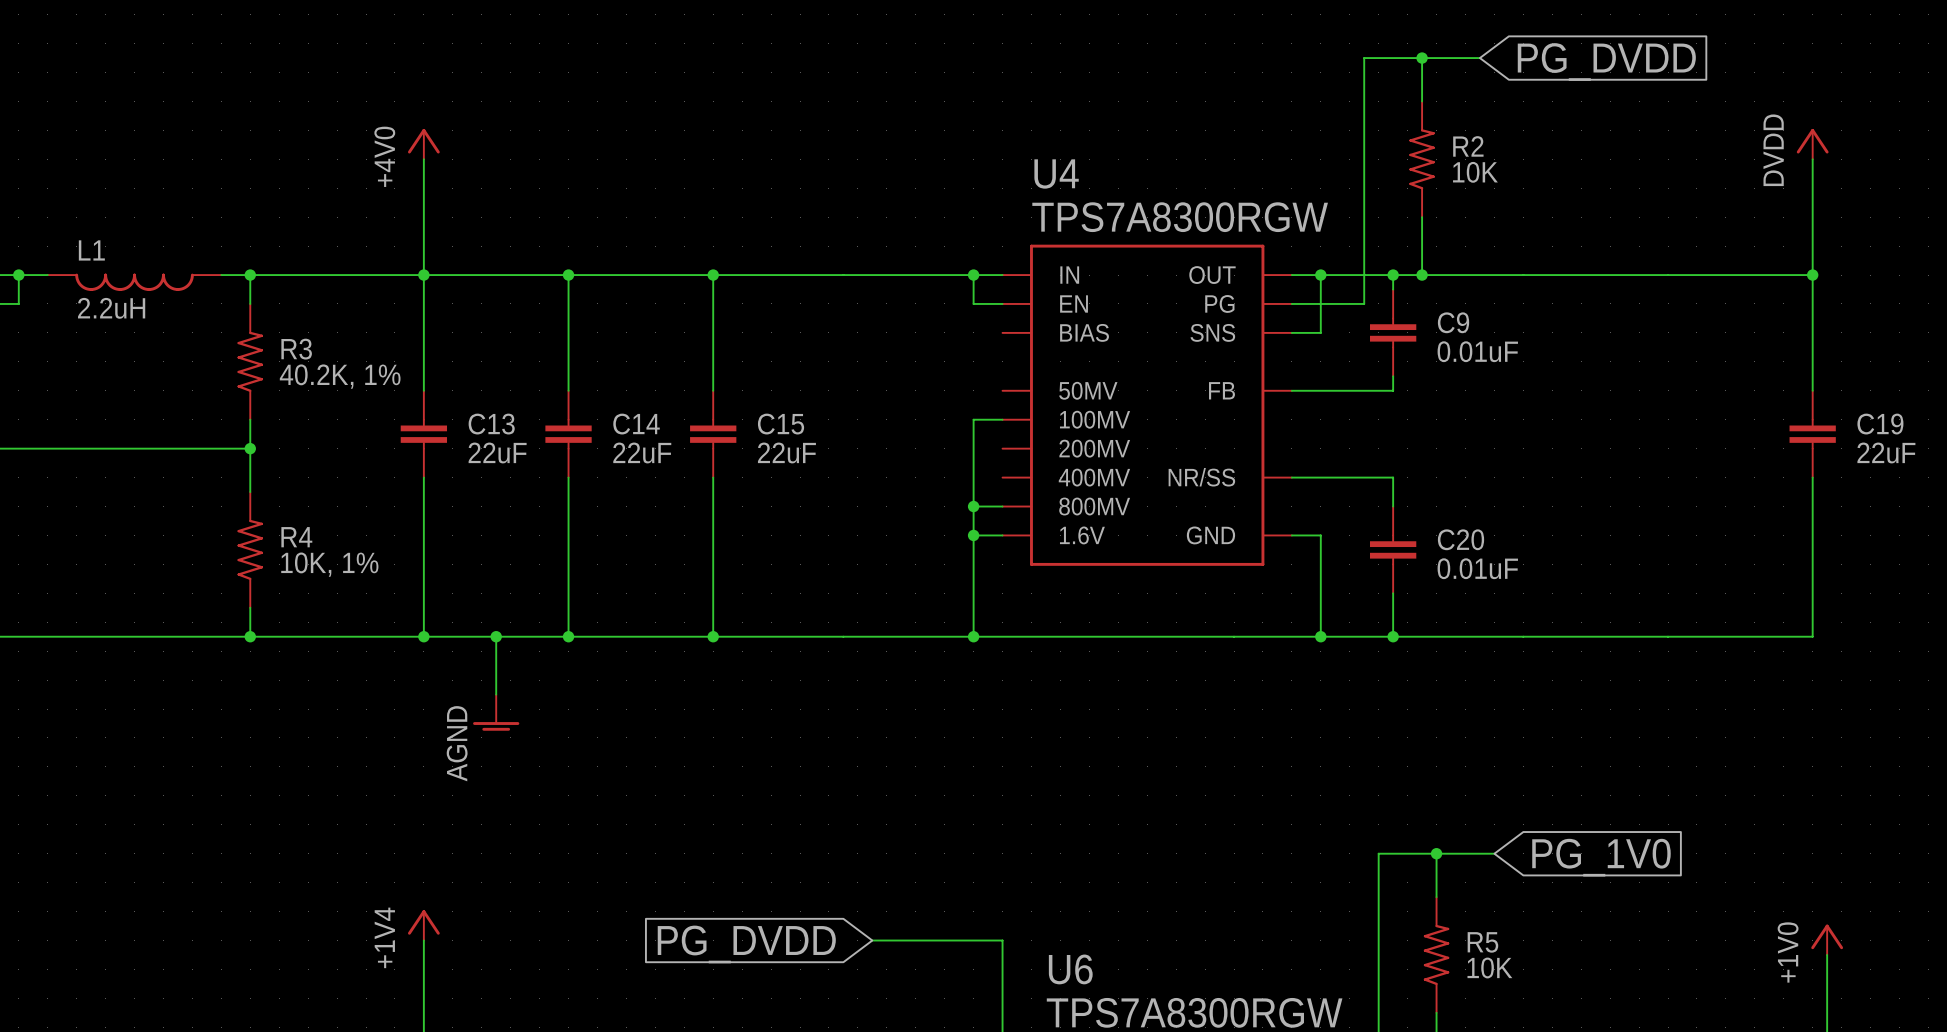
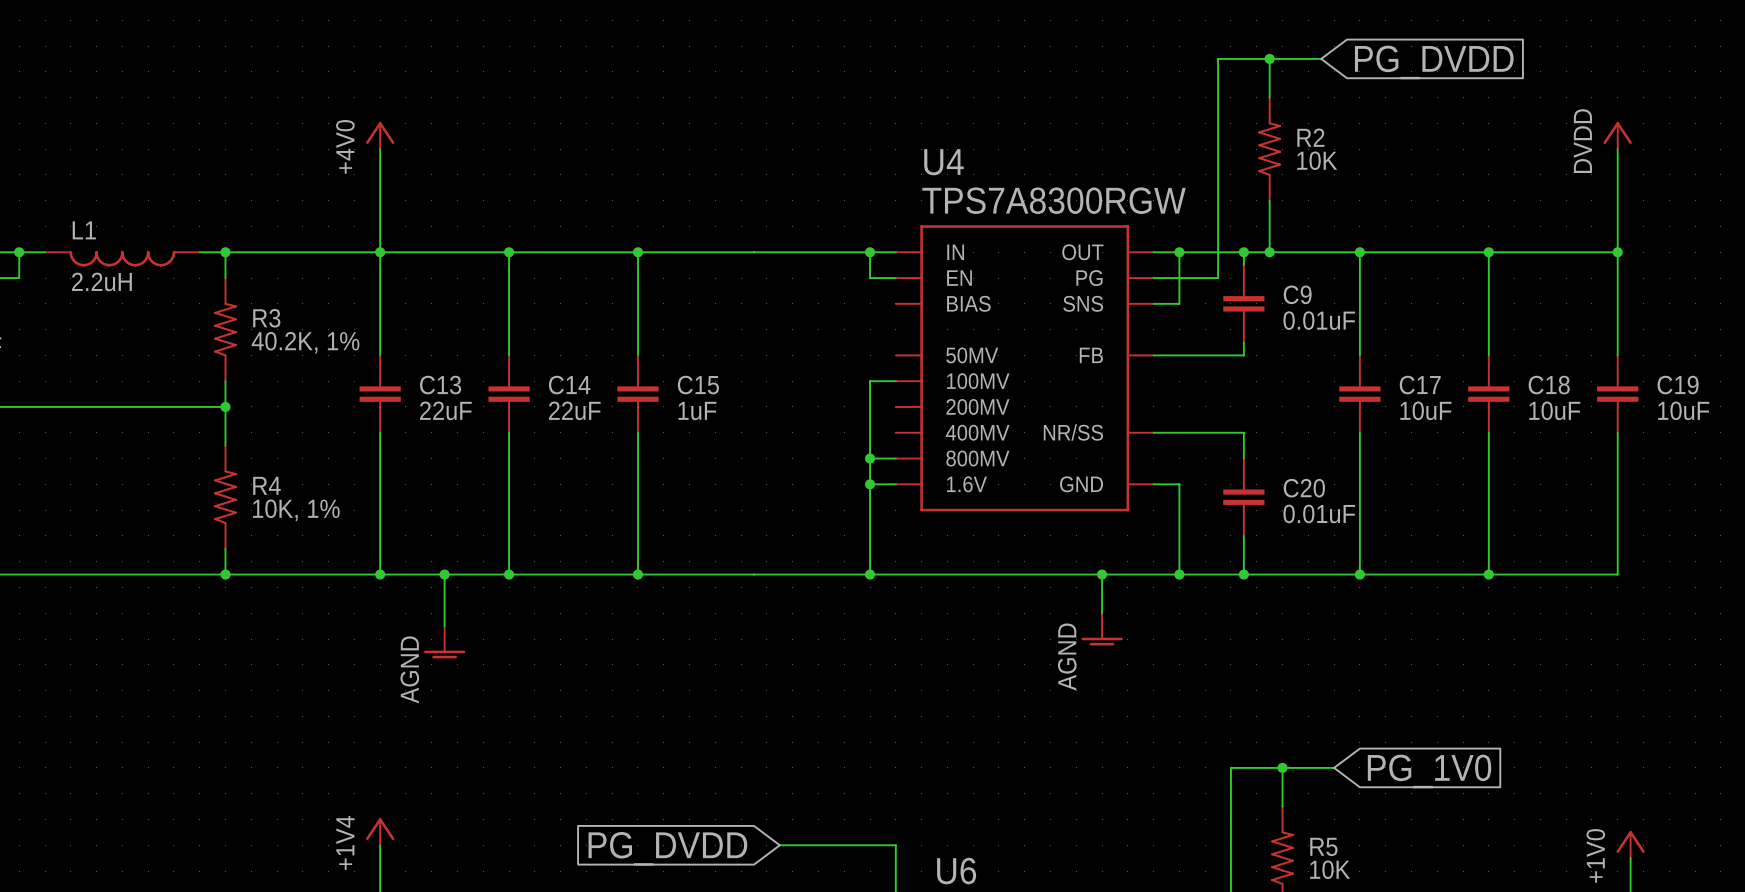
wire: none -> (1359, 252) (1359, 355)
junction: none -> (1359, 252)
wire: none -> (1488, 252) (1488, 355)
junction: none -> (1488, 252)
C17: none -> 10uF (1359, 394)
C18: none -> 10uF (1488, 394)
C15 value: 22uF (786, 452) -> 1uF (697, 410)
C19 value: 22uF (1886, 452) -> 10uF (1683, 410)
wire: none -> (1359, 432) (1359, 574)
wire: none -> (1488, 432) (1488, 574)
wire: none -> (1102, 574) (1102, 613)
junction: none -> (1102, 574)
junction: none -> (1359, 574)
junction: none -> (1488, 574)
power symbol: none -> AGND (1102, 629)

